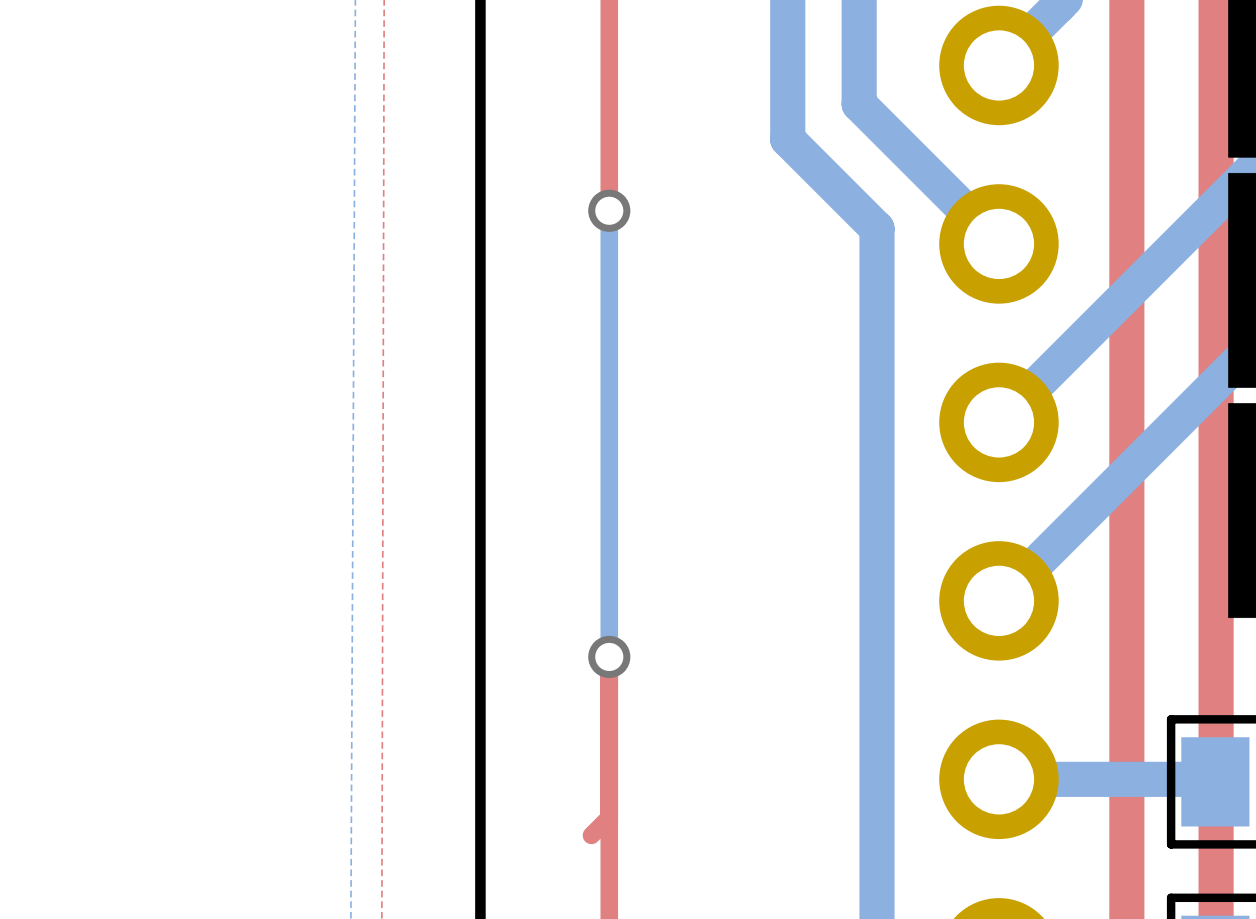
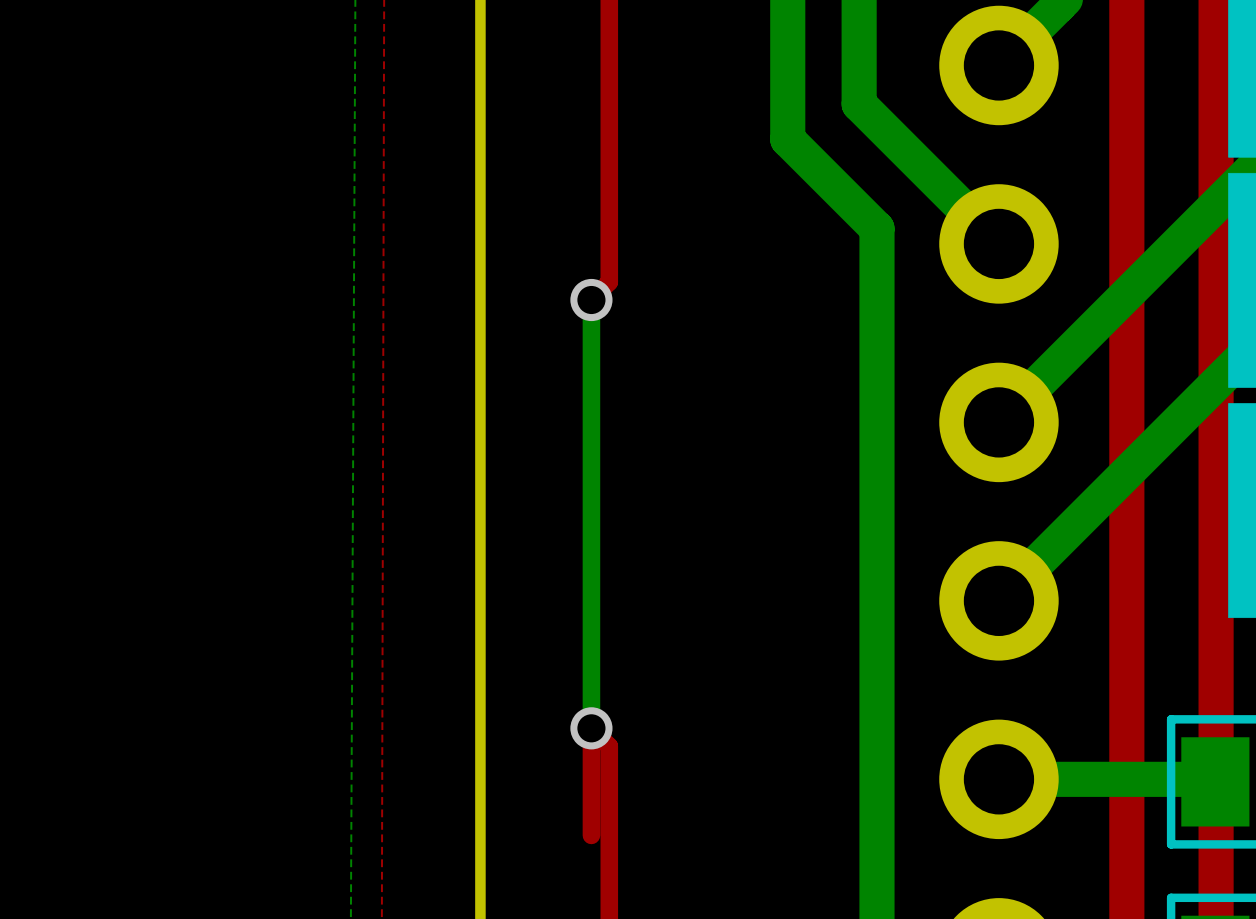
top track: none -> (609, 210) (609, 282) (591, 300)
bottom track: (609, 210) (609, 656) -> none
via position: (609, 210) -> (591, 300)
bottom track: none -> (591, 300) (591, 728)
top track: (609, 656) (609, 746) -> none
via position: (609, 656) -> (591, 728)
top track: (609, 817) (591, 835) -> (609, 746) (591, 728) (591, 835)

